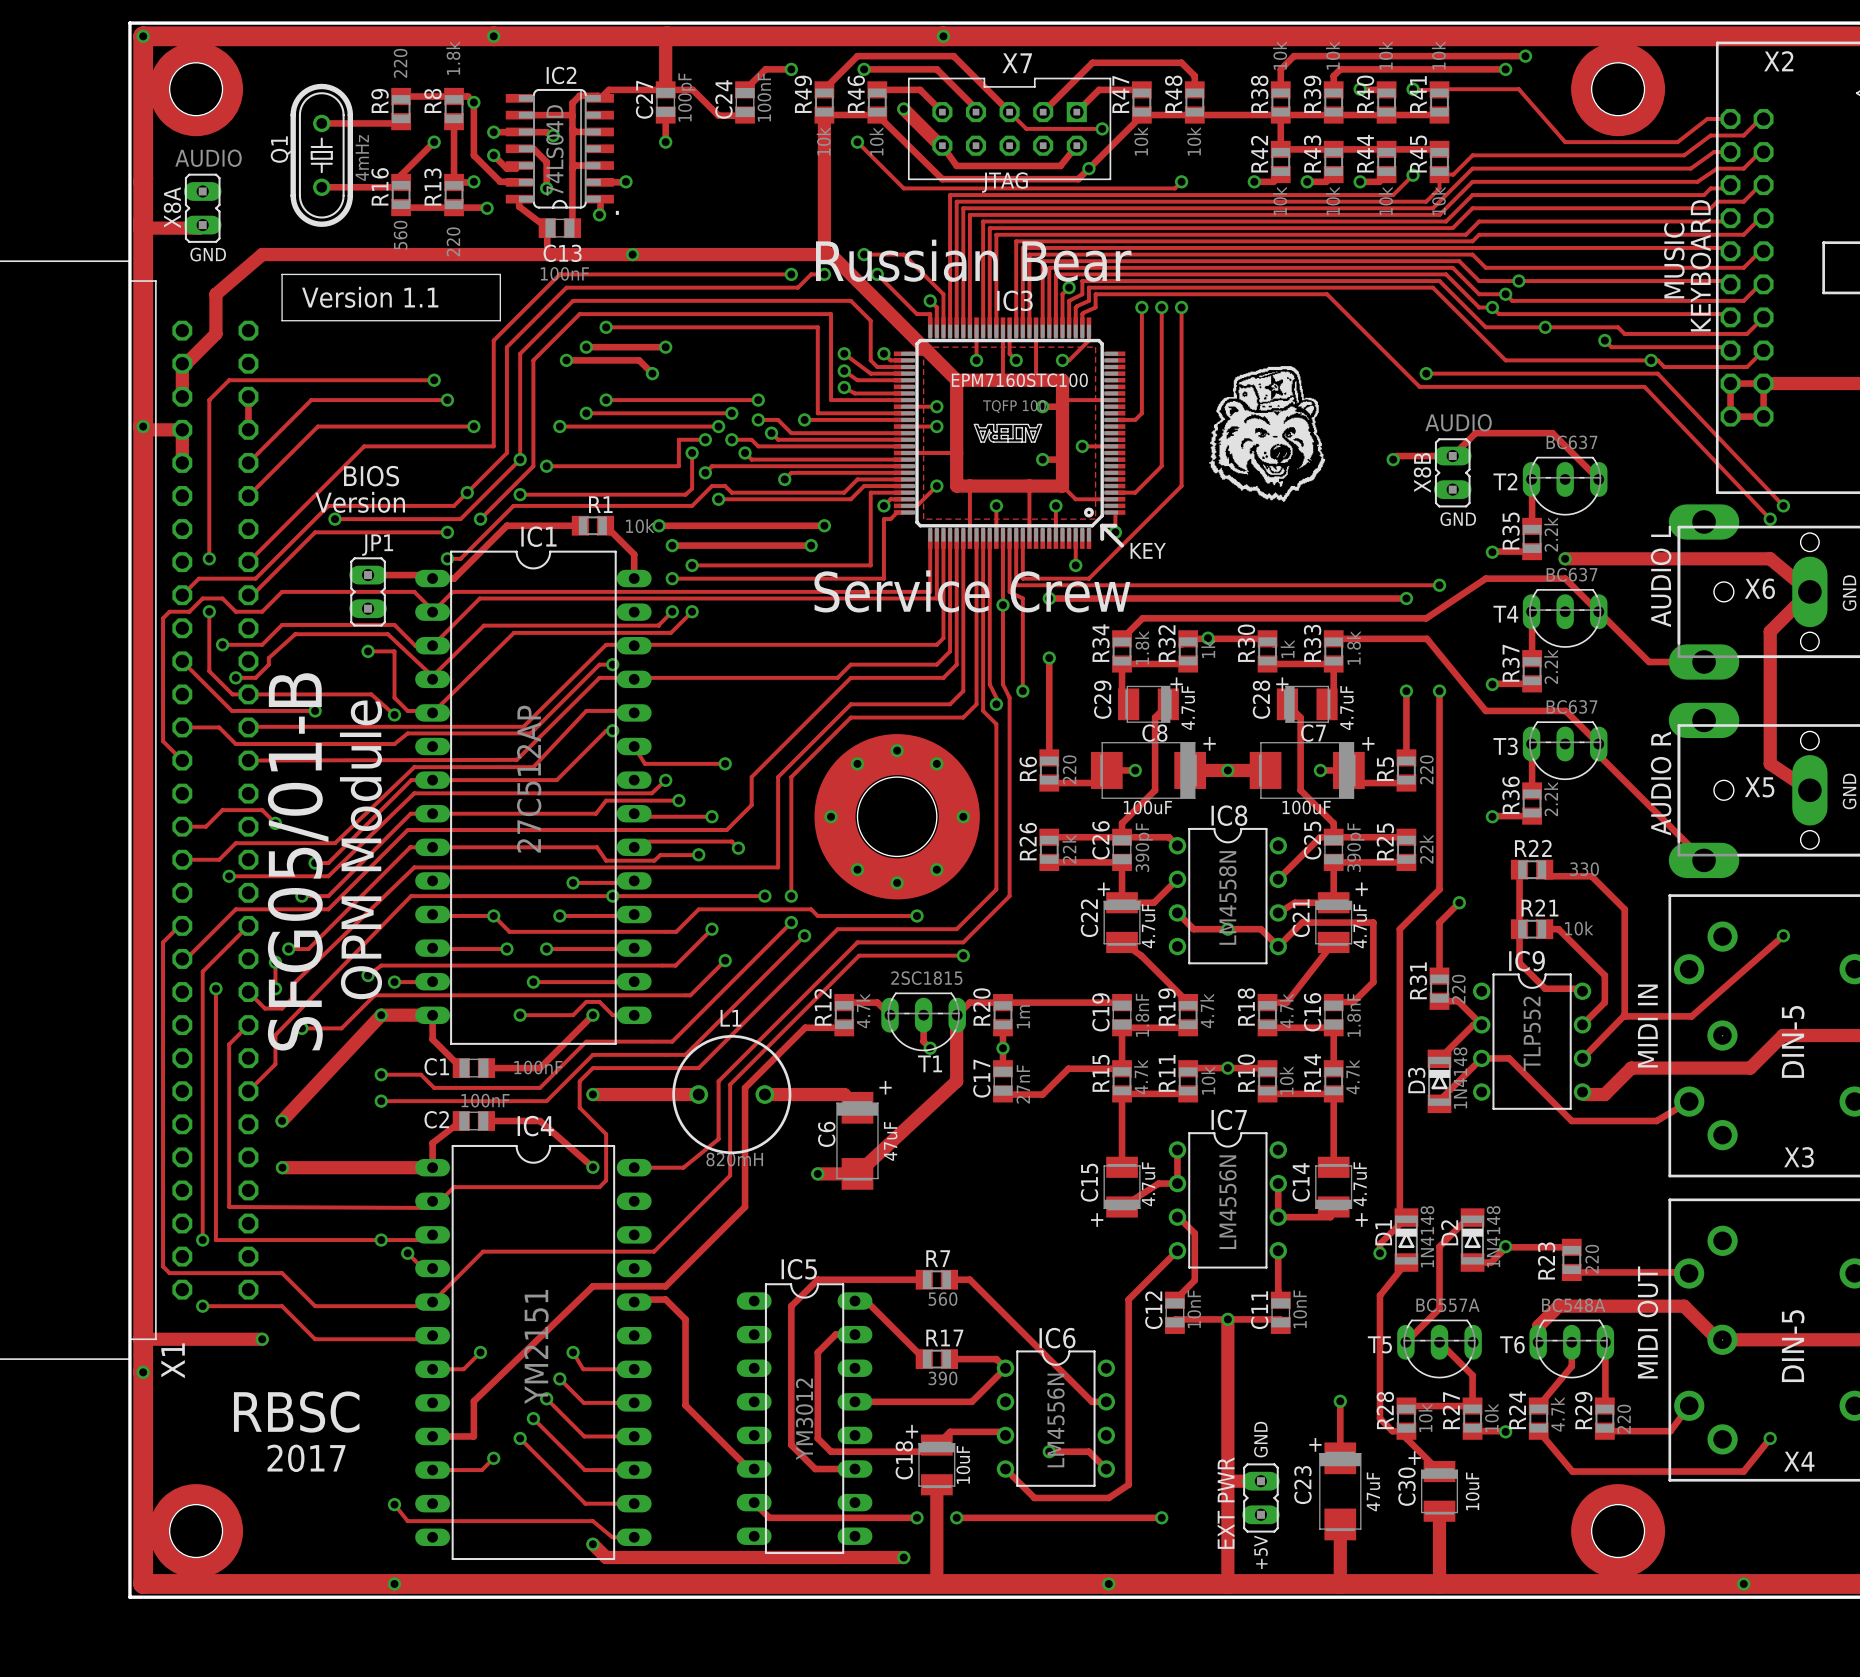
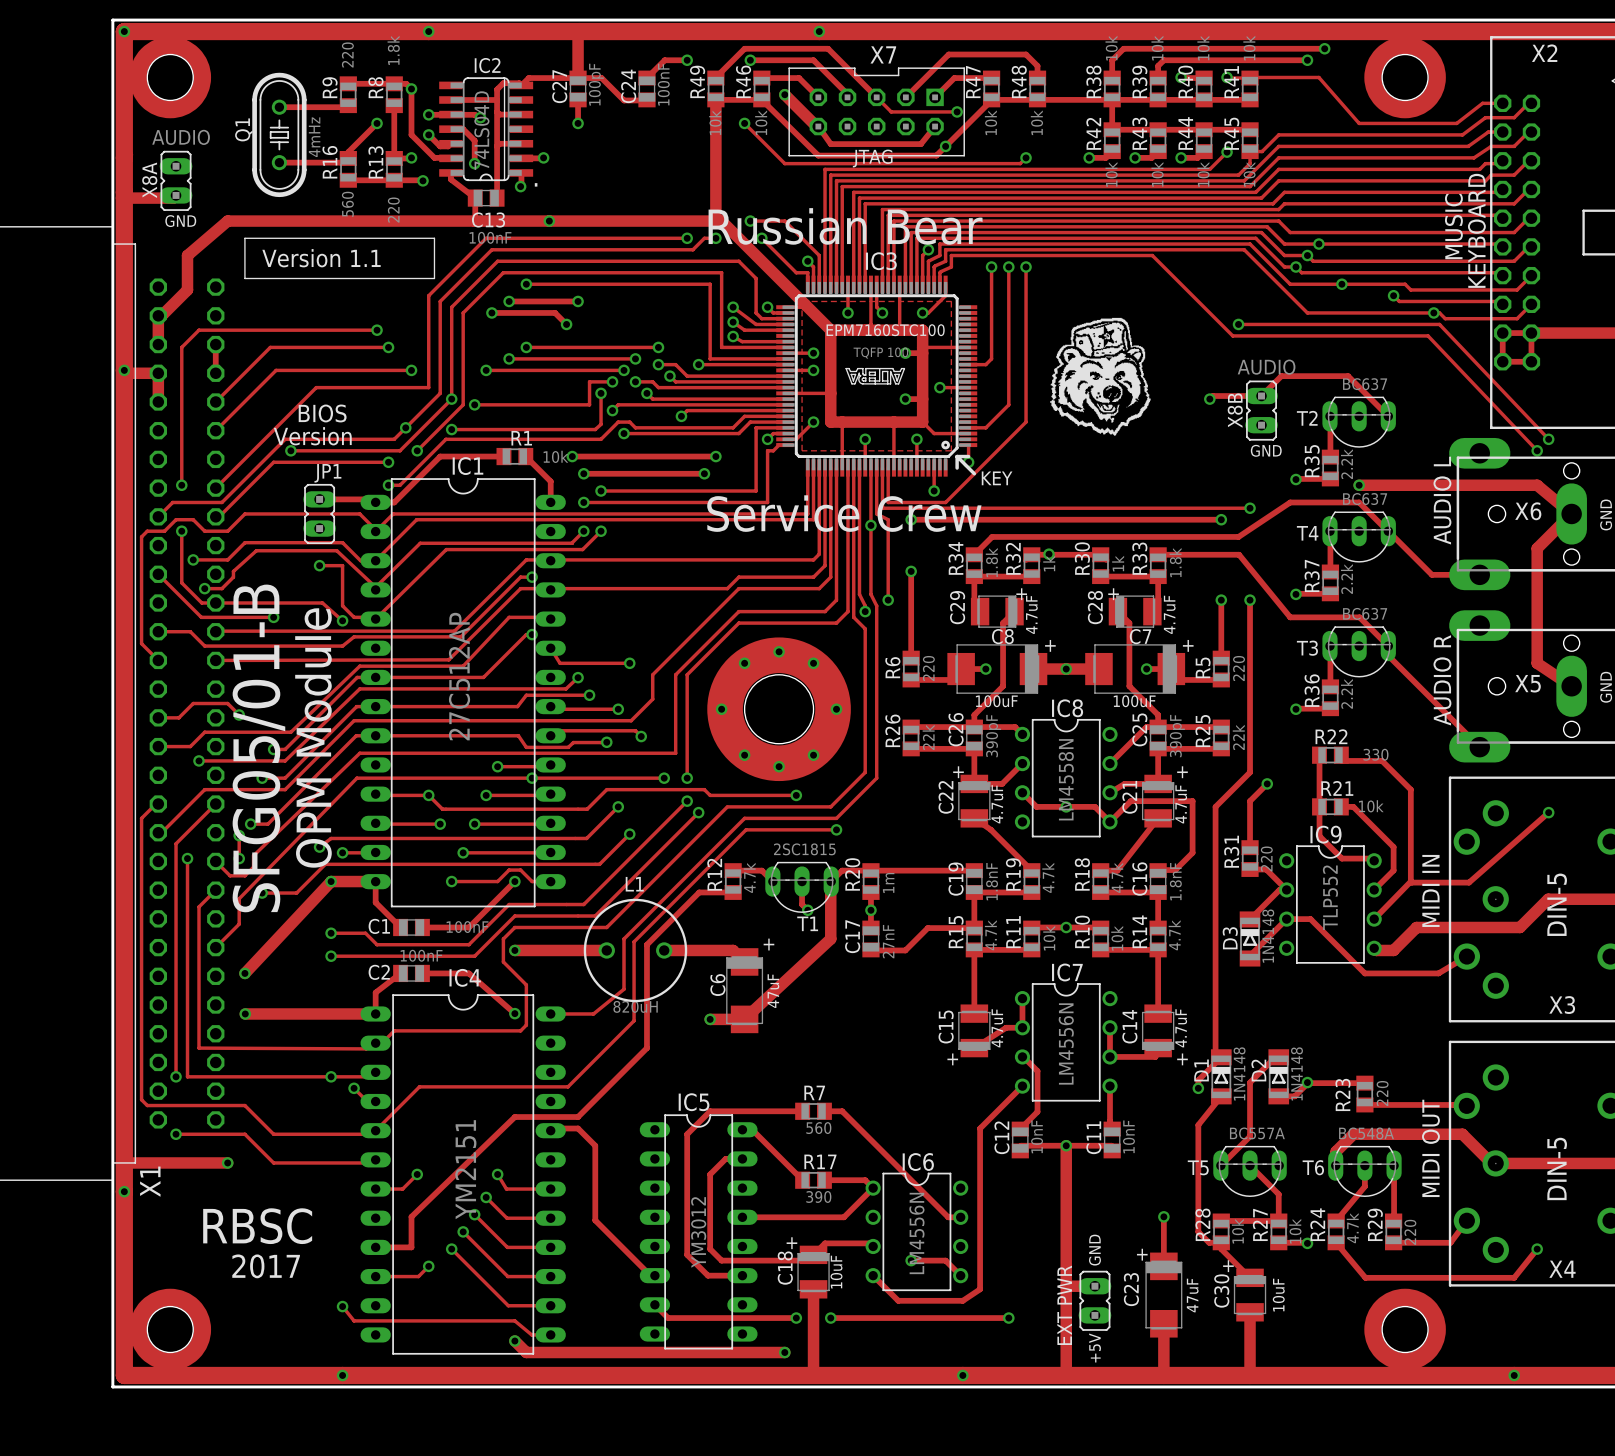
L1 value: 820mH (734, 1159) -> 820uH (635, 1006)

